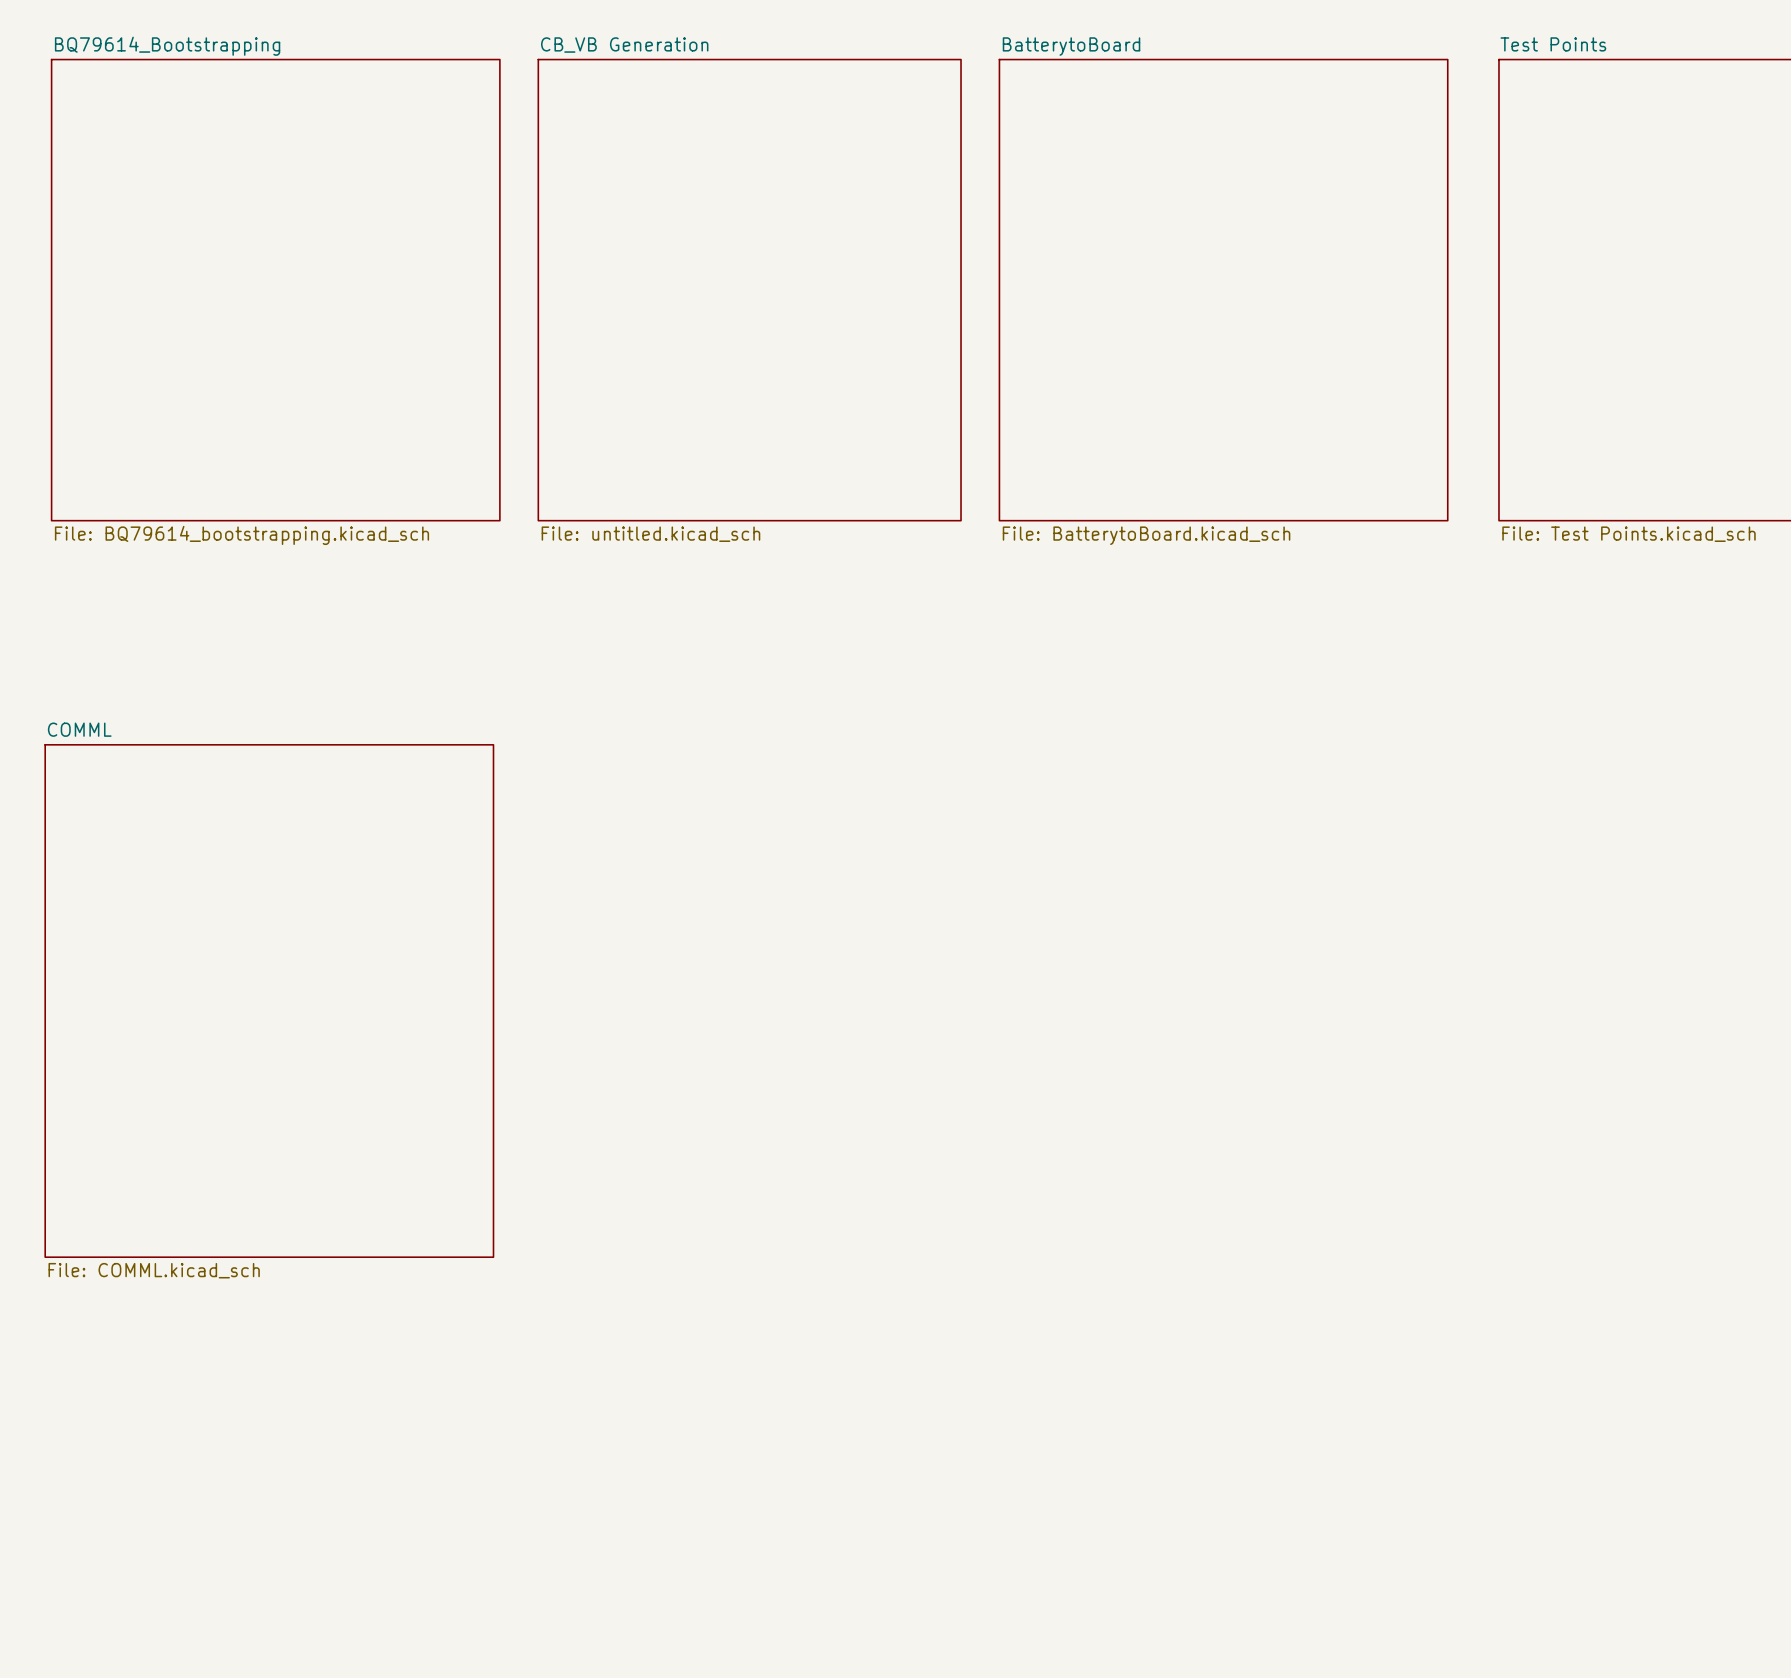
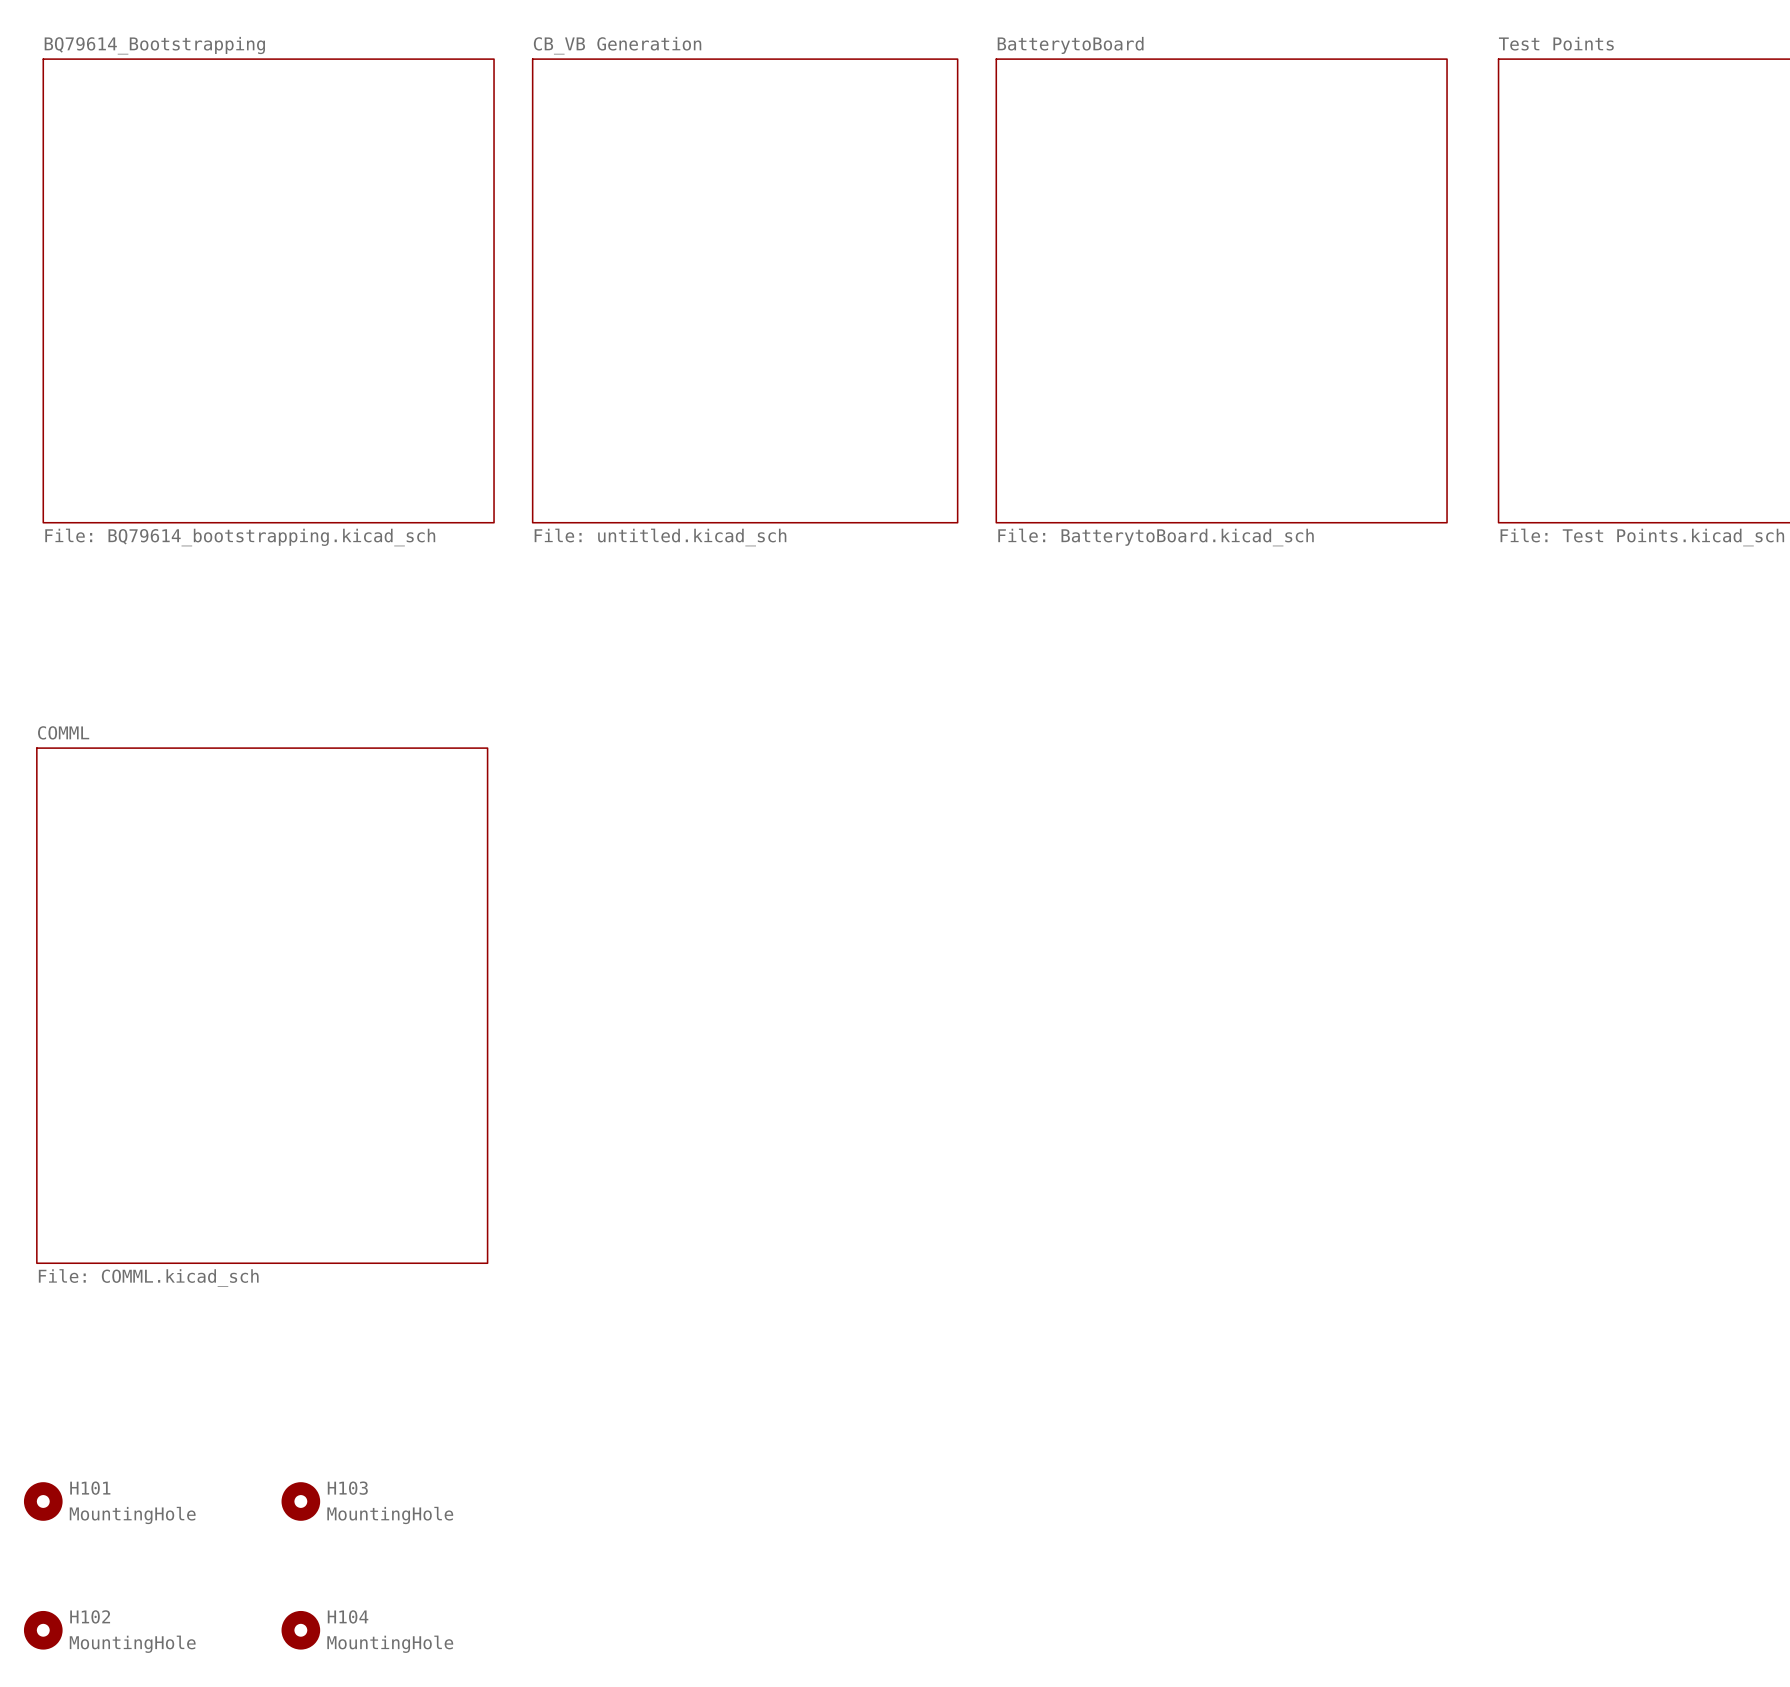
H101: none -> MountingHole (43, 1501)
H103: none -> MountingHole (300, 1501)
H102: none -> MountingHole (43, 1630)
H104: none -> MountingHole (300, 1630)

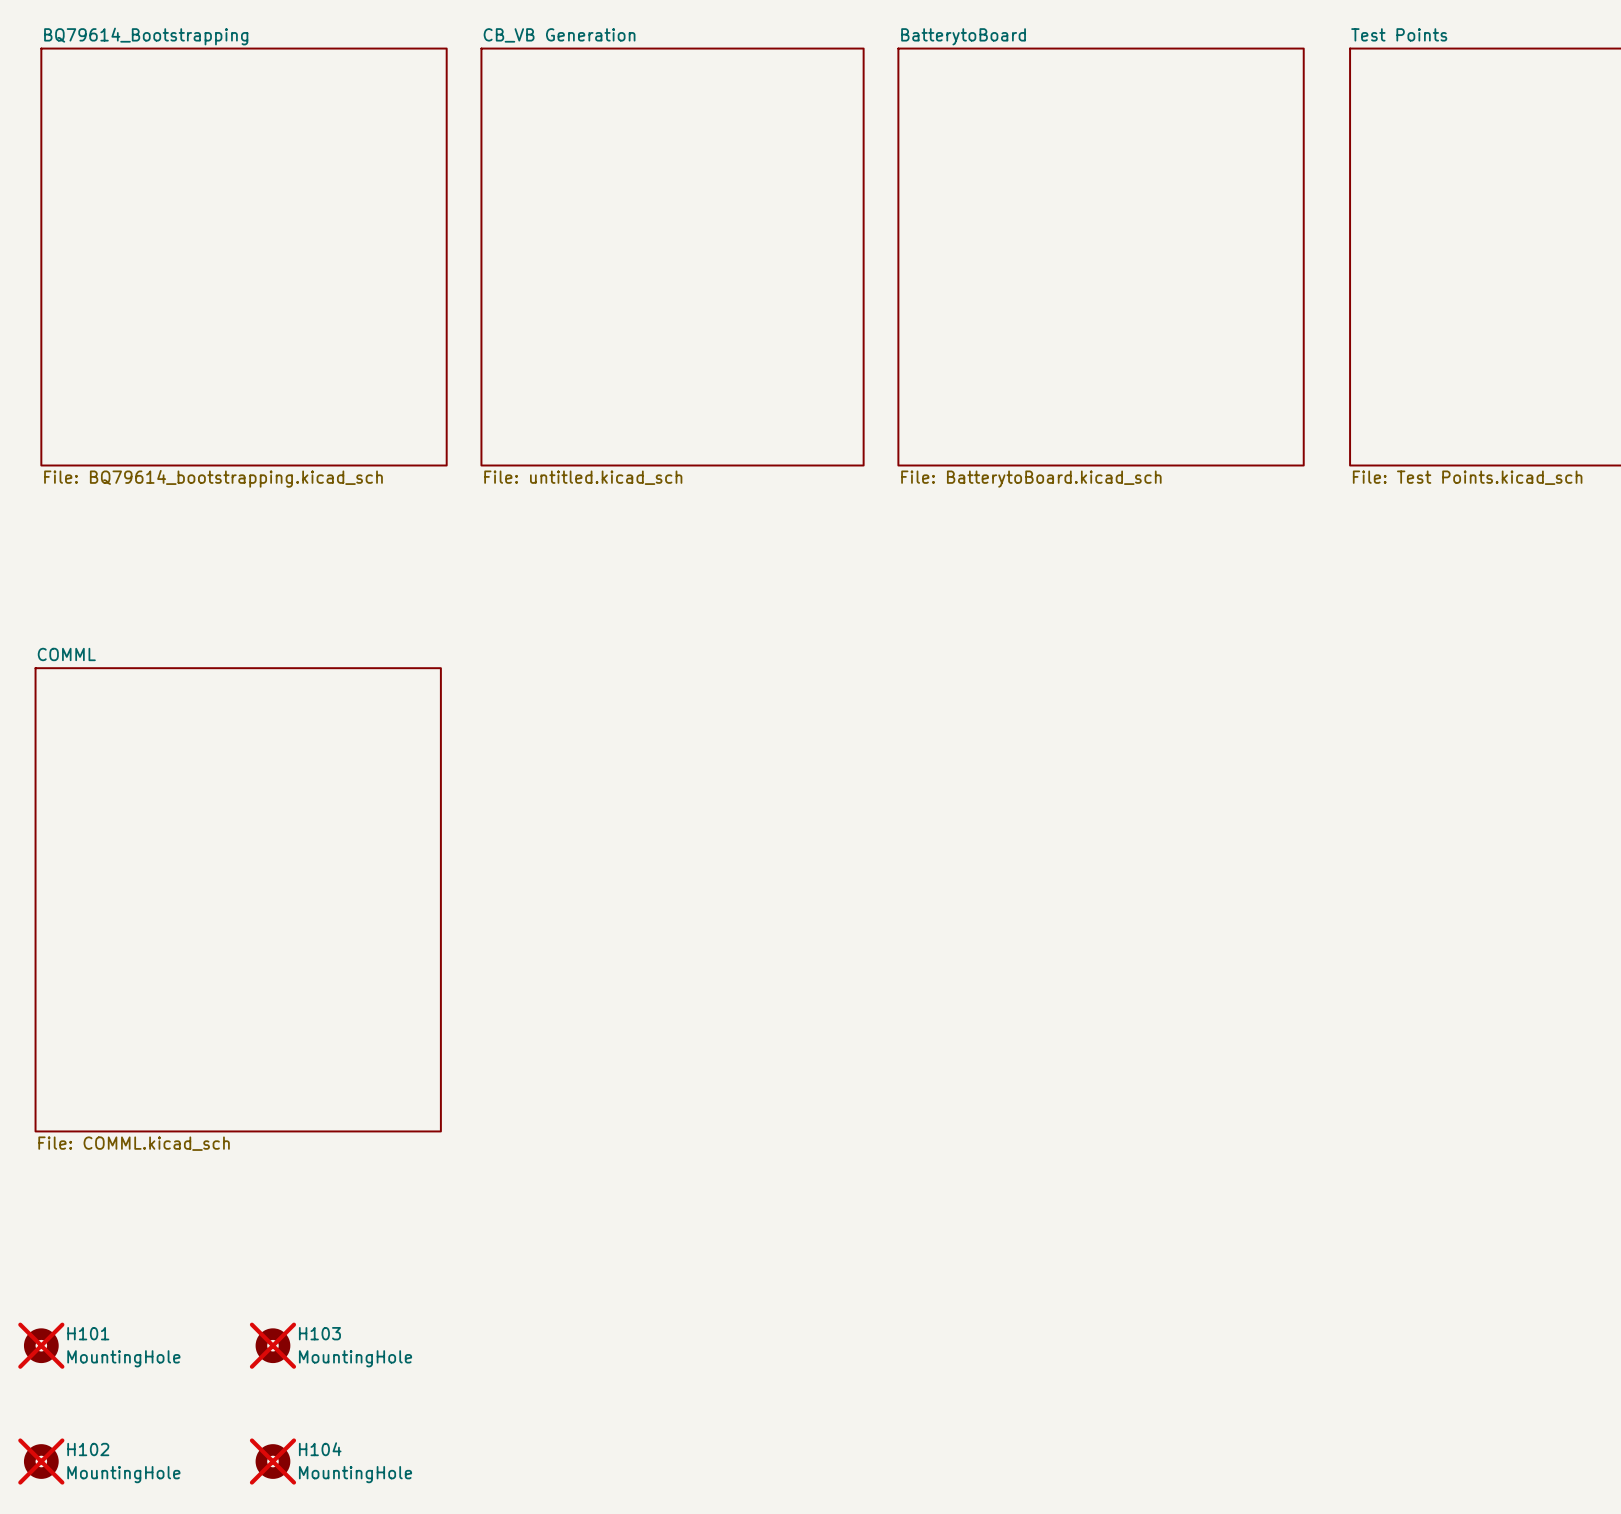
H101 do-not-place cross: none -> (41, 1345)
H103 do-not-place cross: none -> (272, 1345)
H102 do-not-place cross: none -> (41, 1461)
H104 do-not-place cross: none -> (272, 1461)

